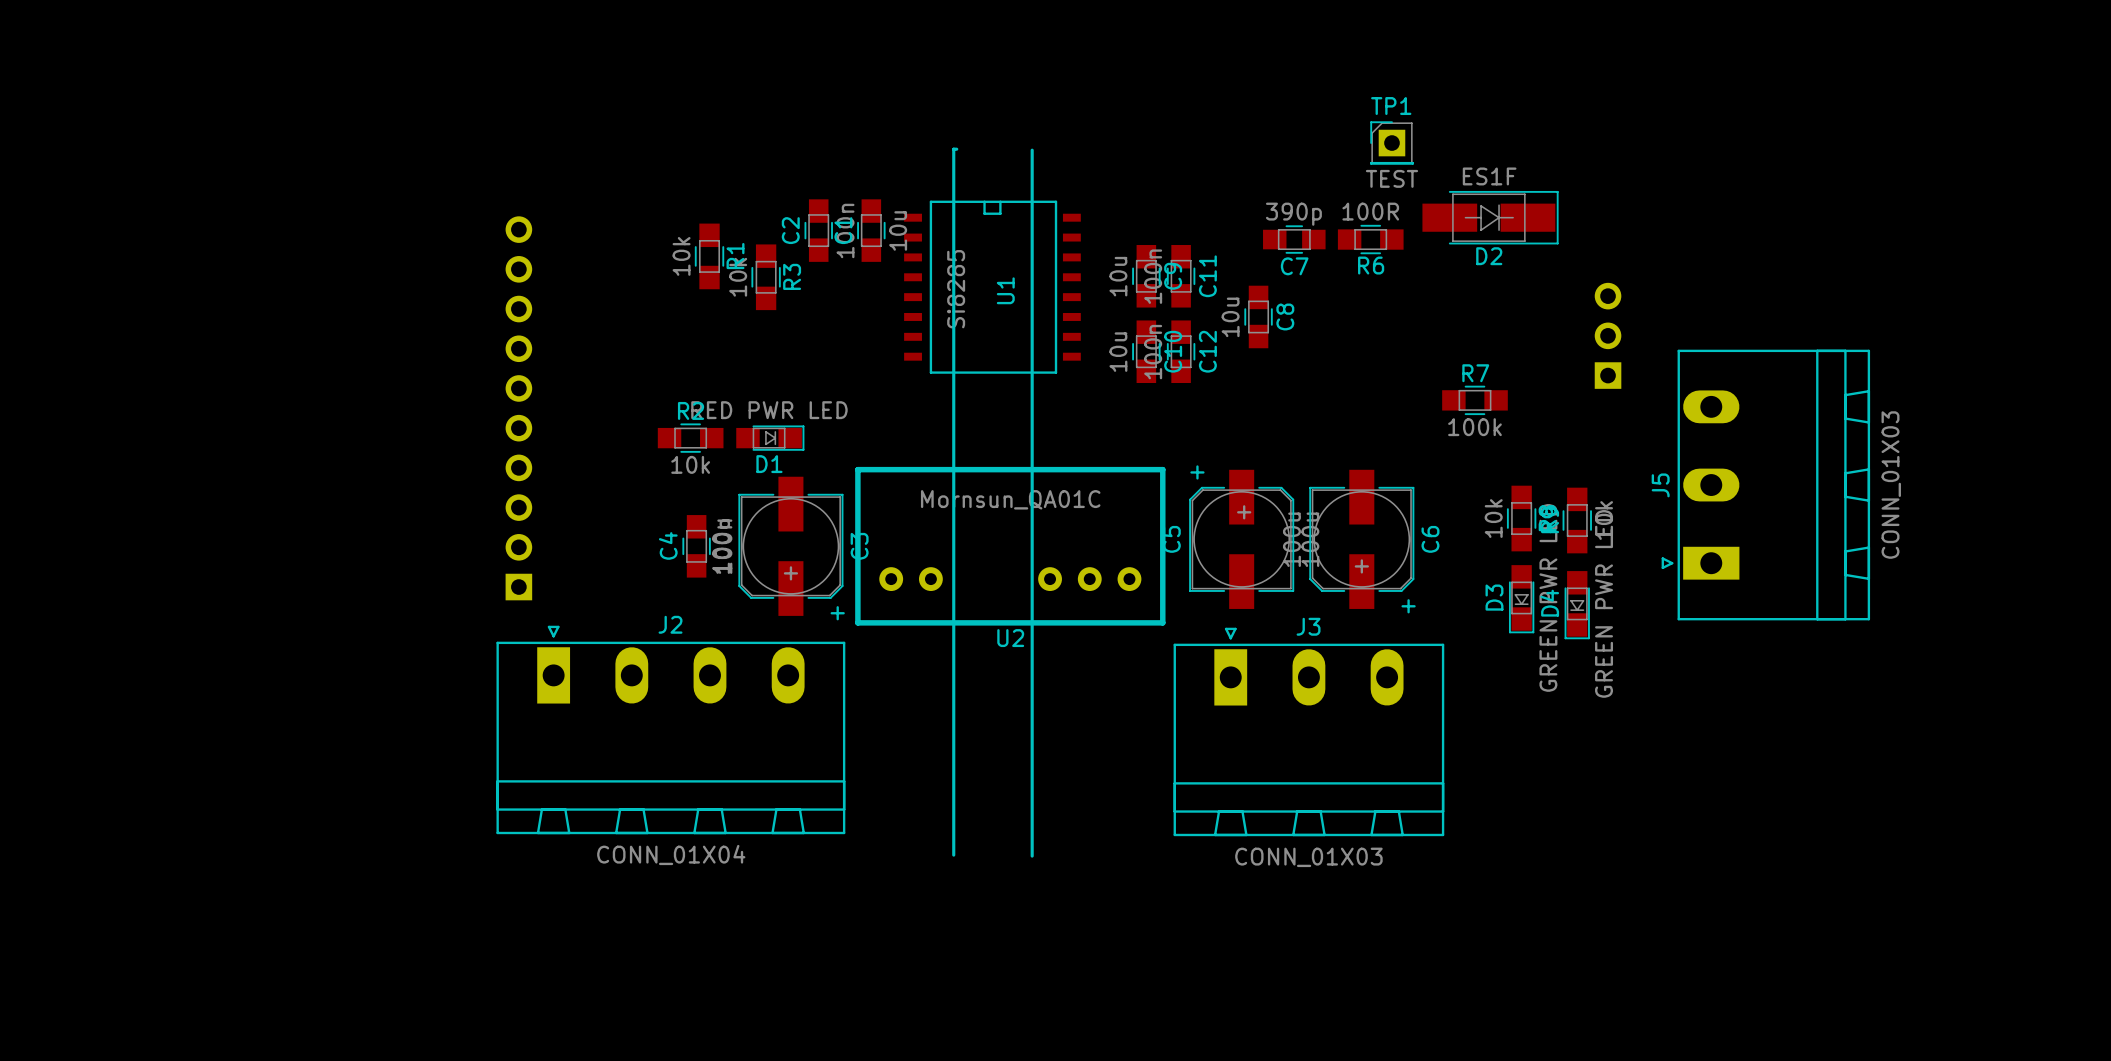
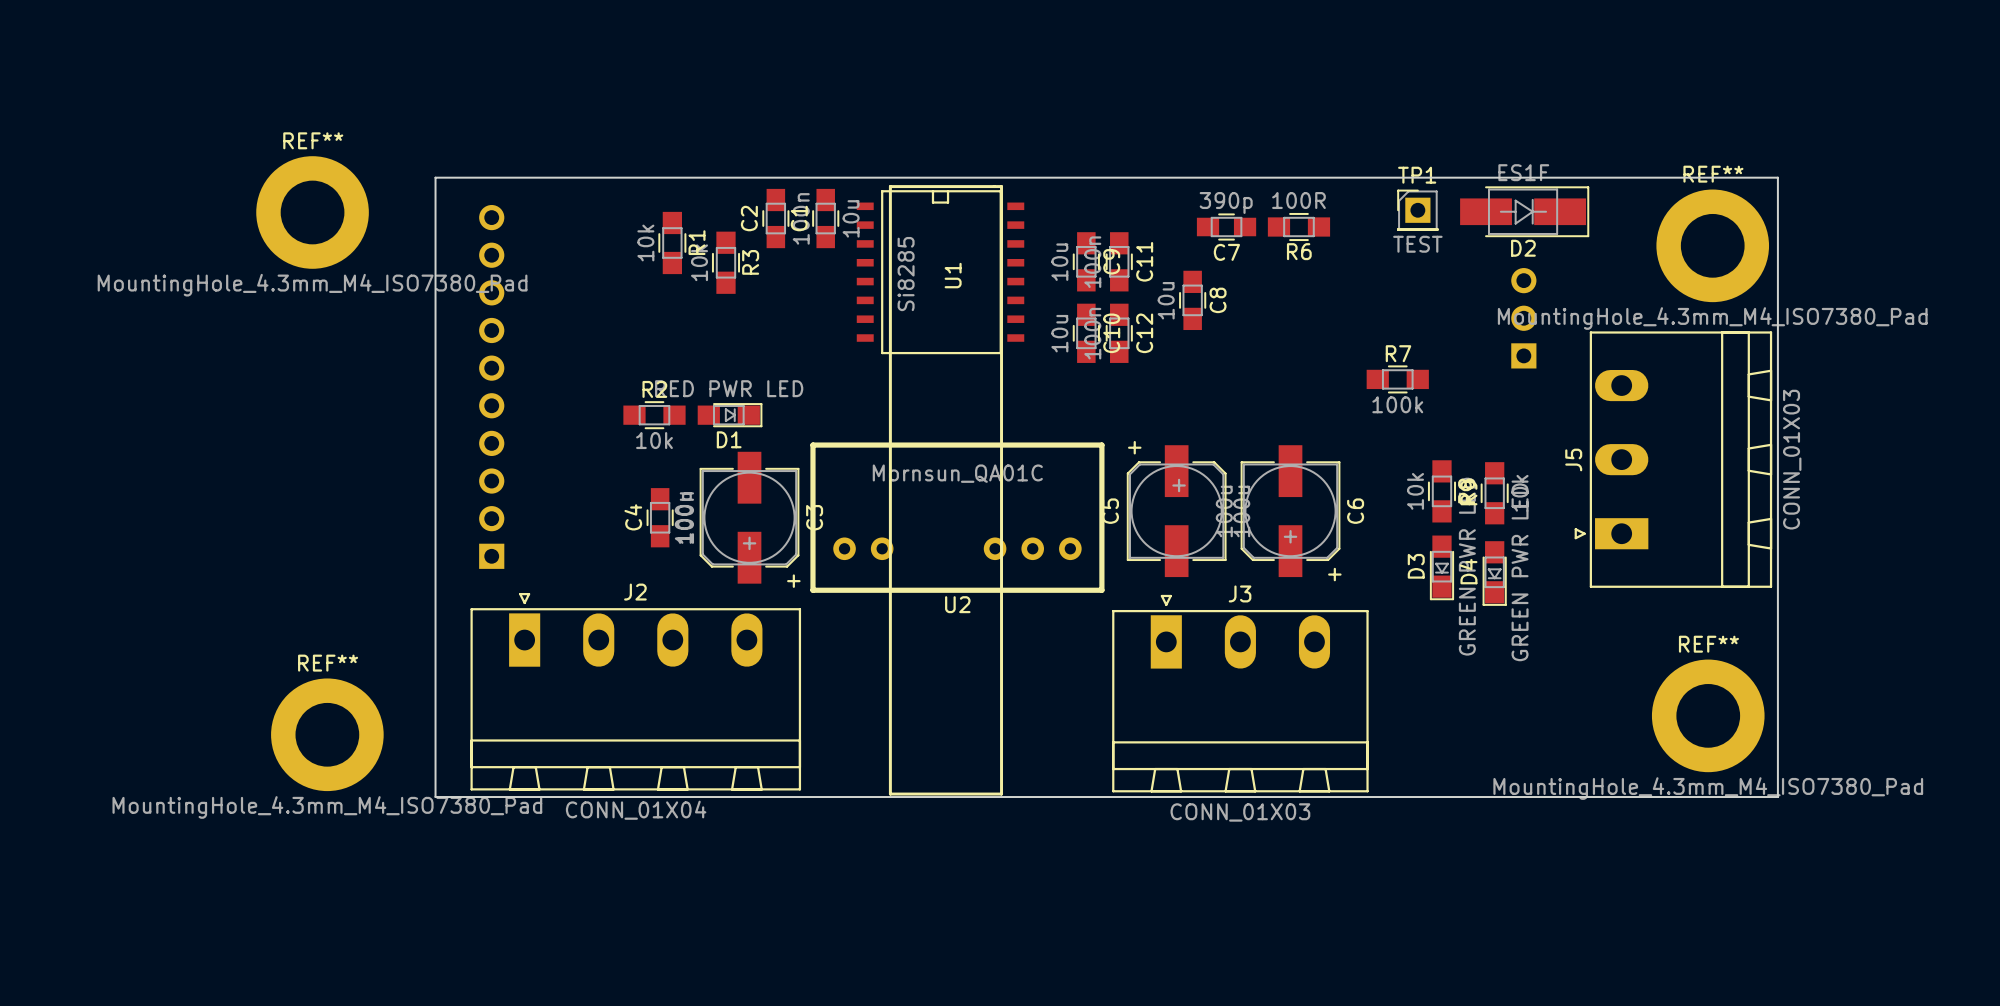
TP1 position: (1391, 143) -> (1417, 210)
line: (956, 149) (953, 149) (953, 855) -> none
line: (1032, 150) (1032, 856) -> none
board edge: none -> (435, 177) (435, 797) (1777, 797) (1777, 177) (435, 177)
line: none -> (890, 186) (1001, 186) (1001, 794) (890, 794) (890, 186)
D2 position: (1490, 217) -> (1524, 211)
REF**: none -> MountingHole_4.3mm_M4_ISO7380_Pad (312, 212)
REF**: none -> MountingHole_4.3mm_M4_ISO7380_Pad (1712, 245)
REF**: none -> MountingHole_4.3mm_M4_ISO7380_Pad (1708, 715)
REF**: none -> MountingHole_4.3mm_M4_ISO7380_Pad (327, 734)

